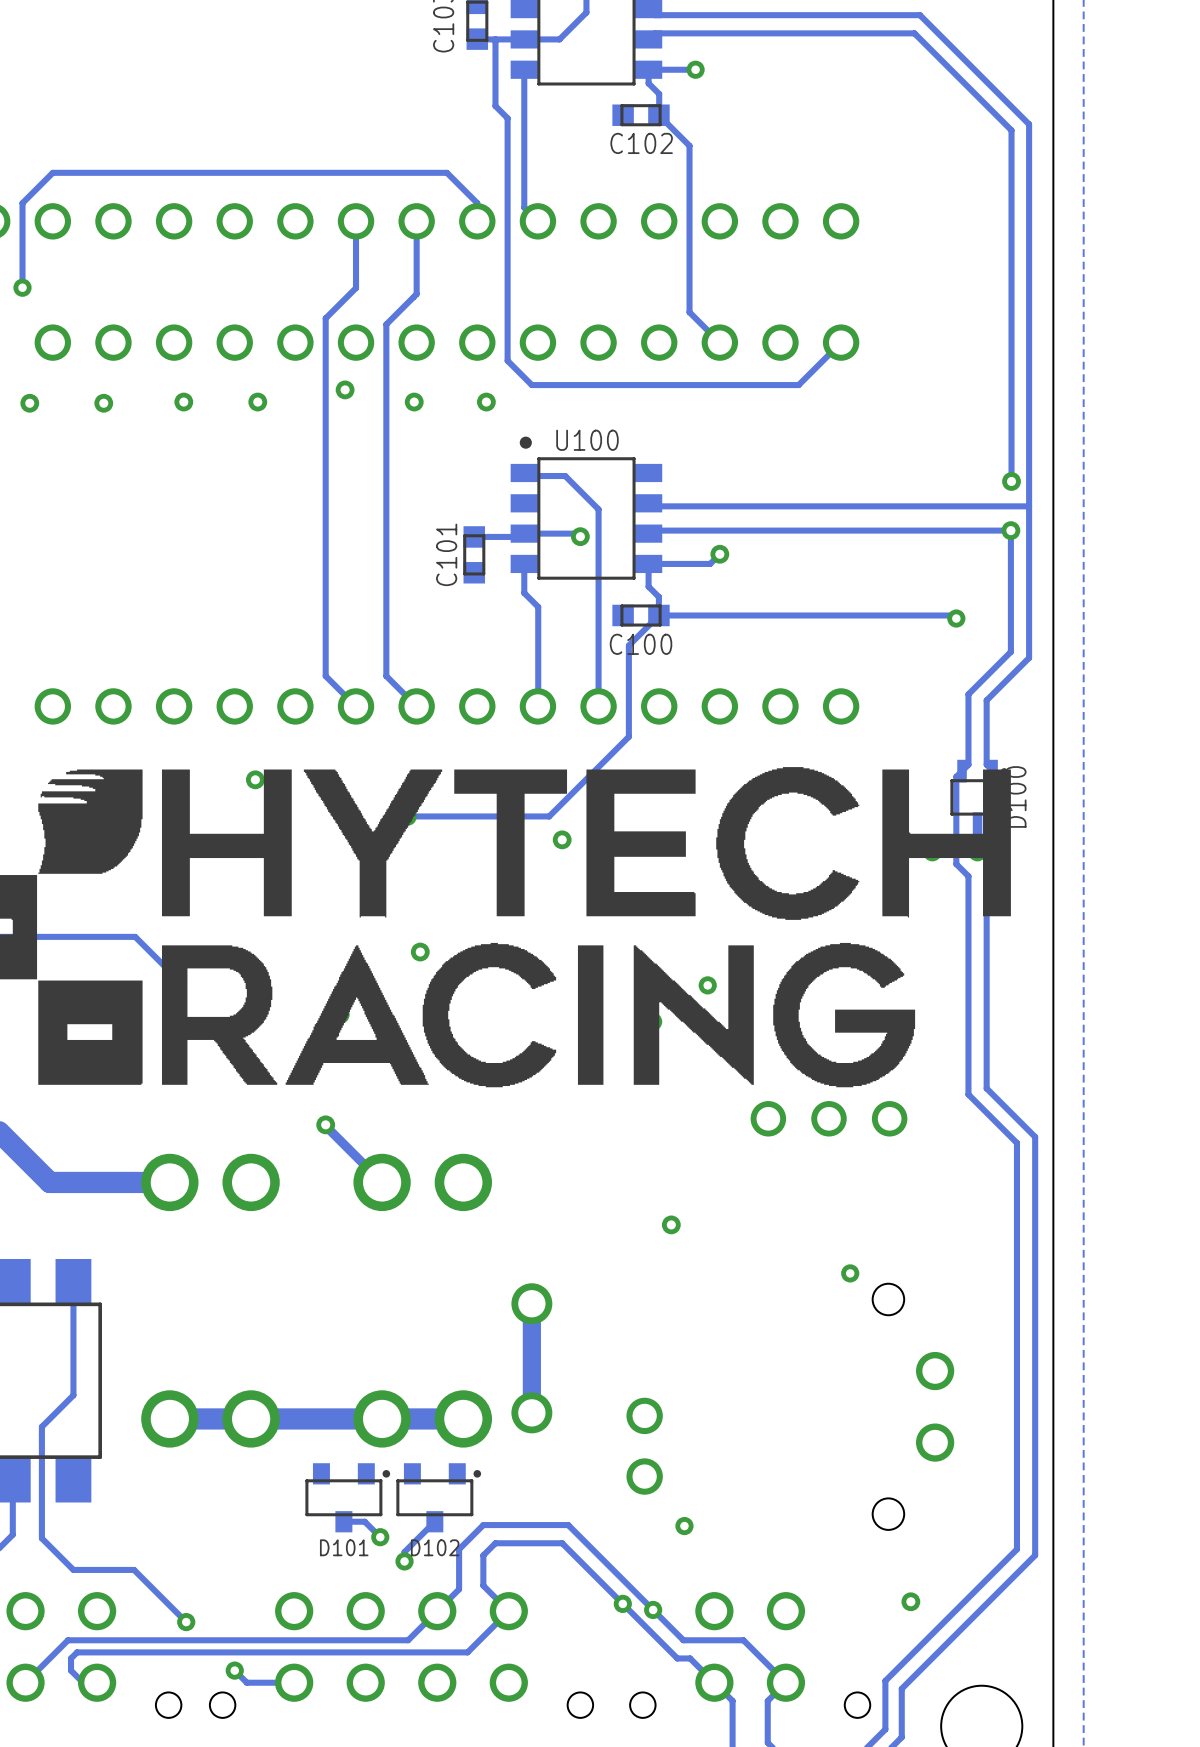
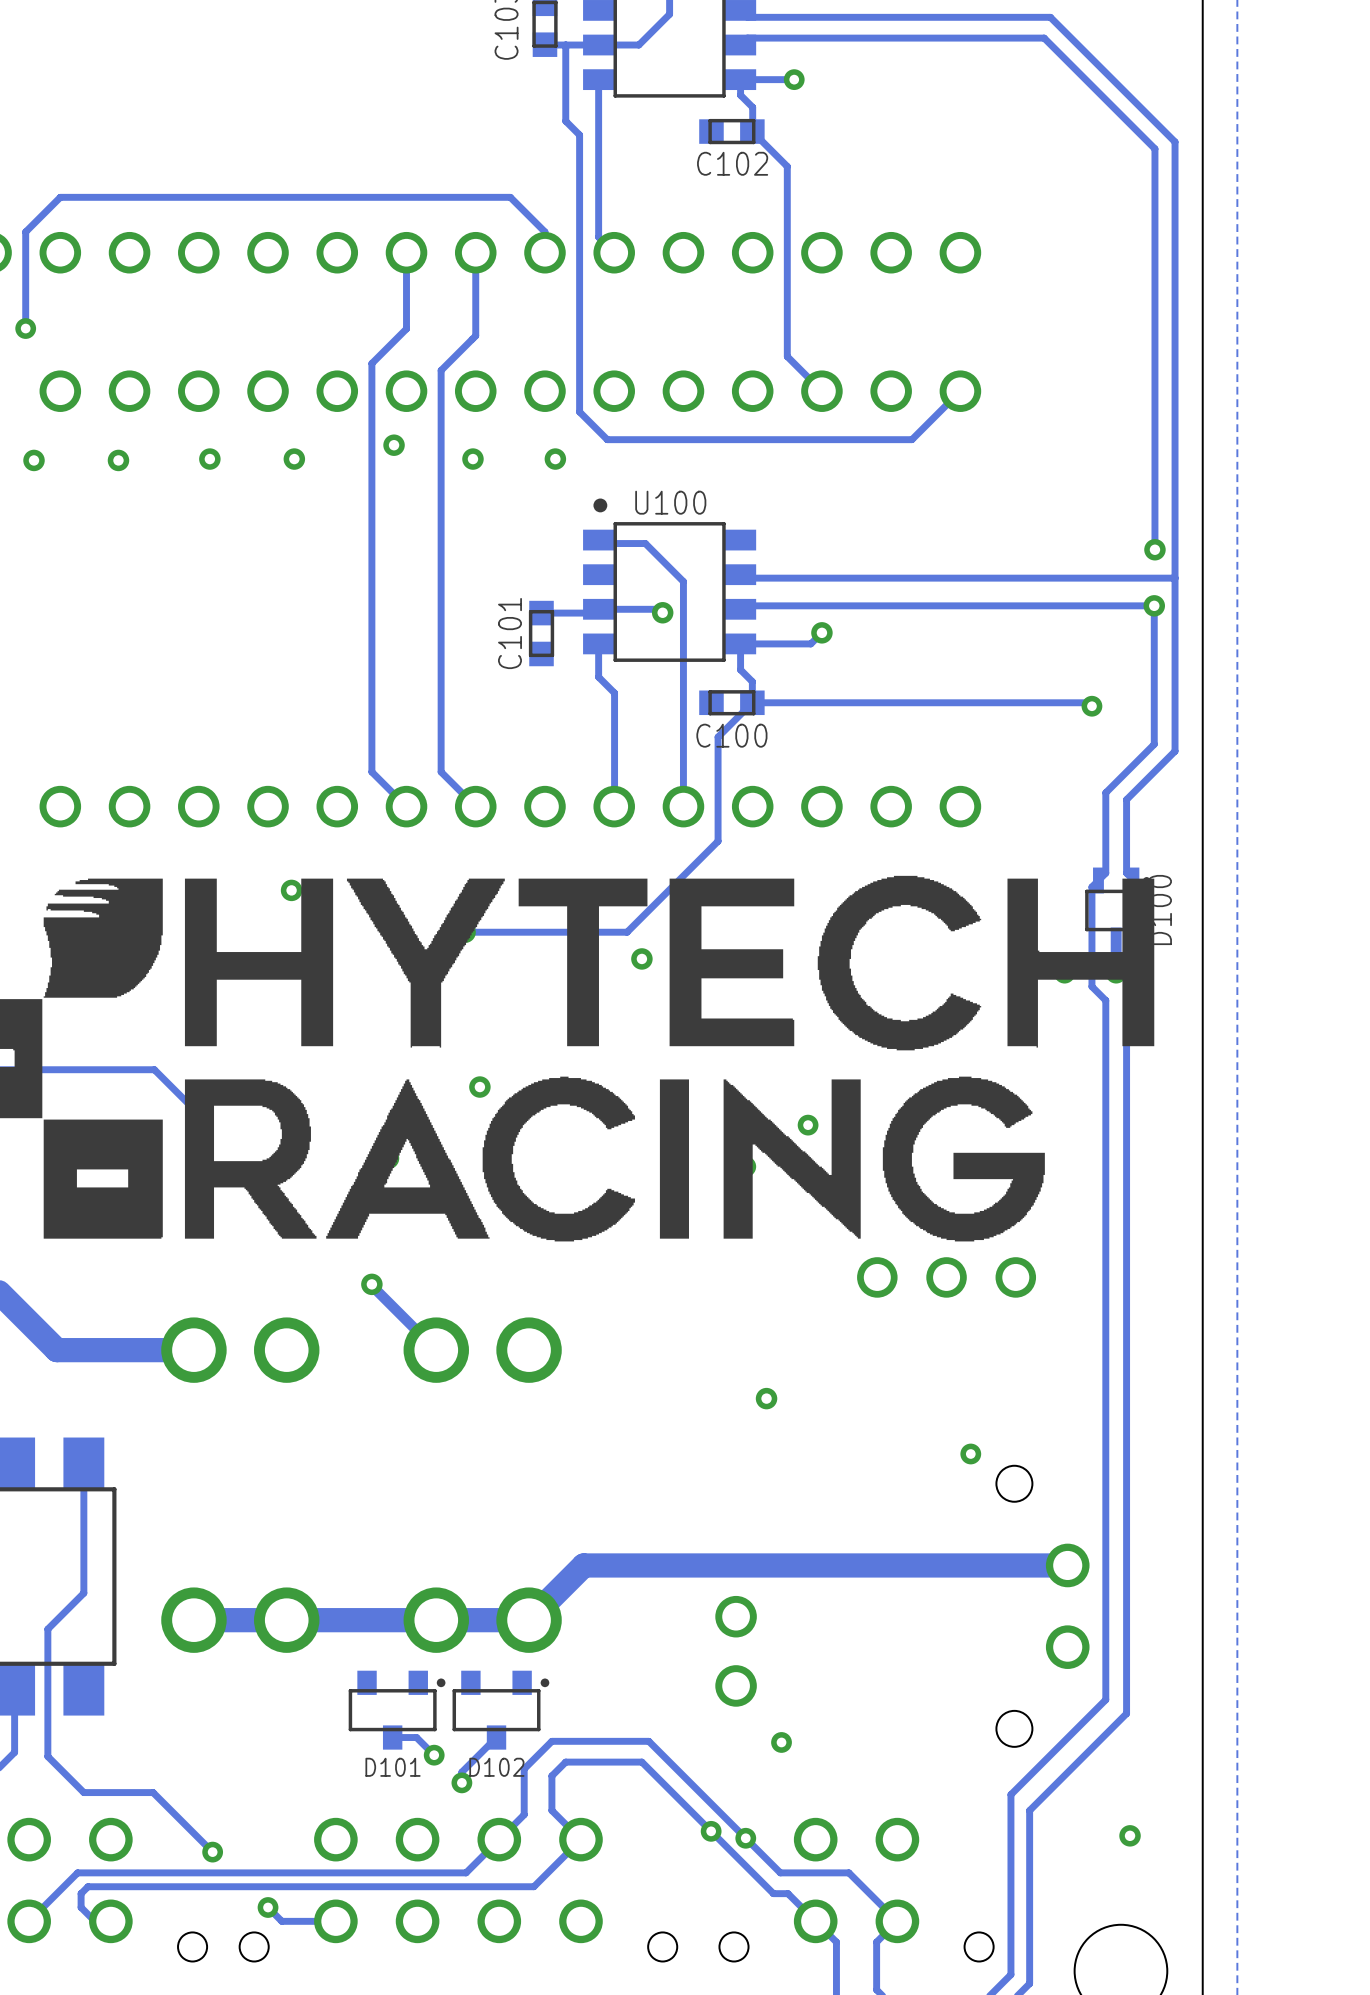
track: (986, 1088) (1035, 1136) (1035, 1555) (901, 1688) -> (1126, 1242) (1126, 1713) (1029, 1810) (1029, 1928)
track: (968, 1094) (1016, 1143) (1016, 1549) (885, 1680) -> (1105, 1249) (1105, 1699) (1010, 1794) (1010, 1919)
track: (531, 1303) (531, 1412) -> none
via: (531, 1303) -> none
track: none -> (1067, 1565) (583, 1565) (529, 1620)
via: (531, 1412) -> none
via position: (910, 1601) -> (1130, 1835)

